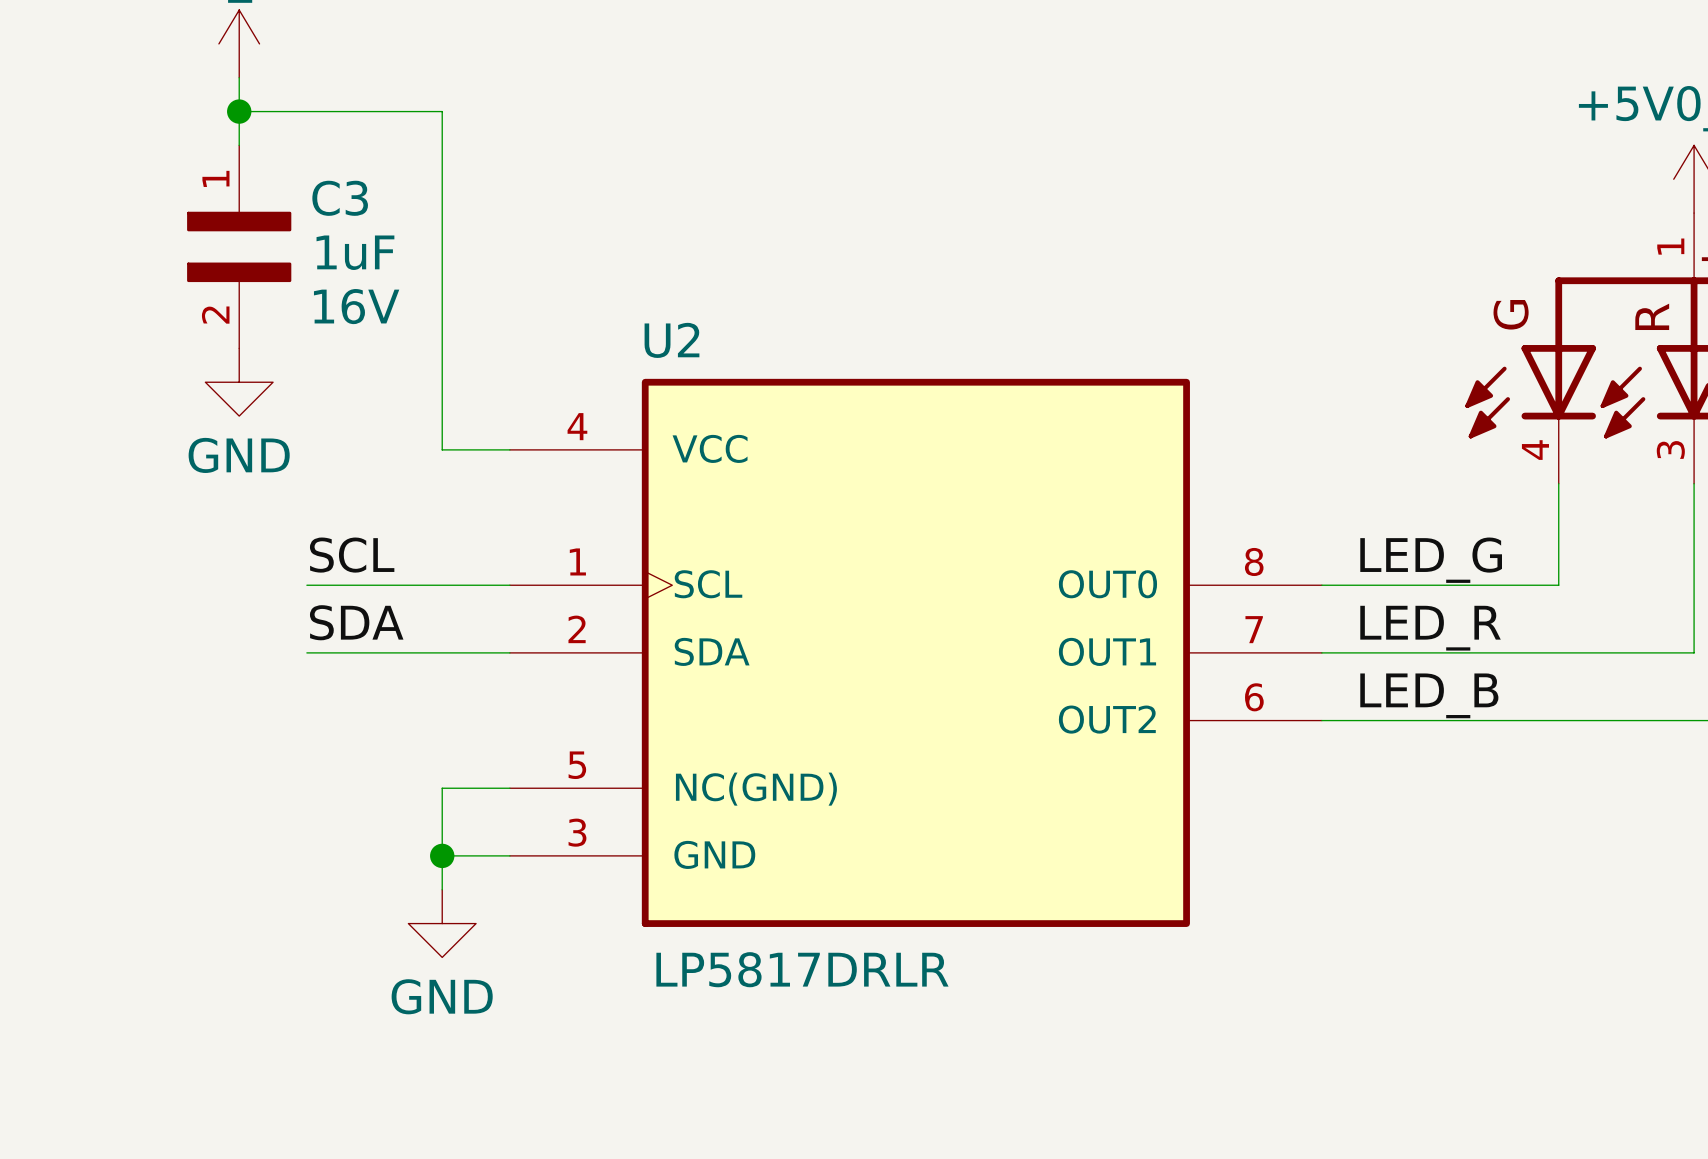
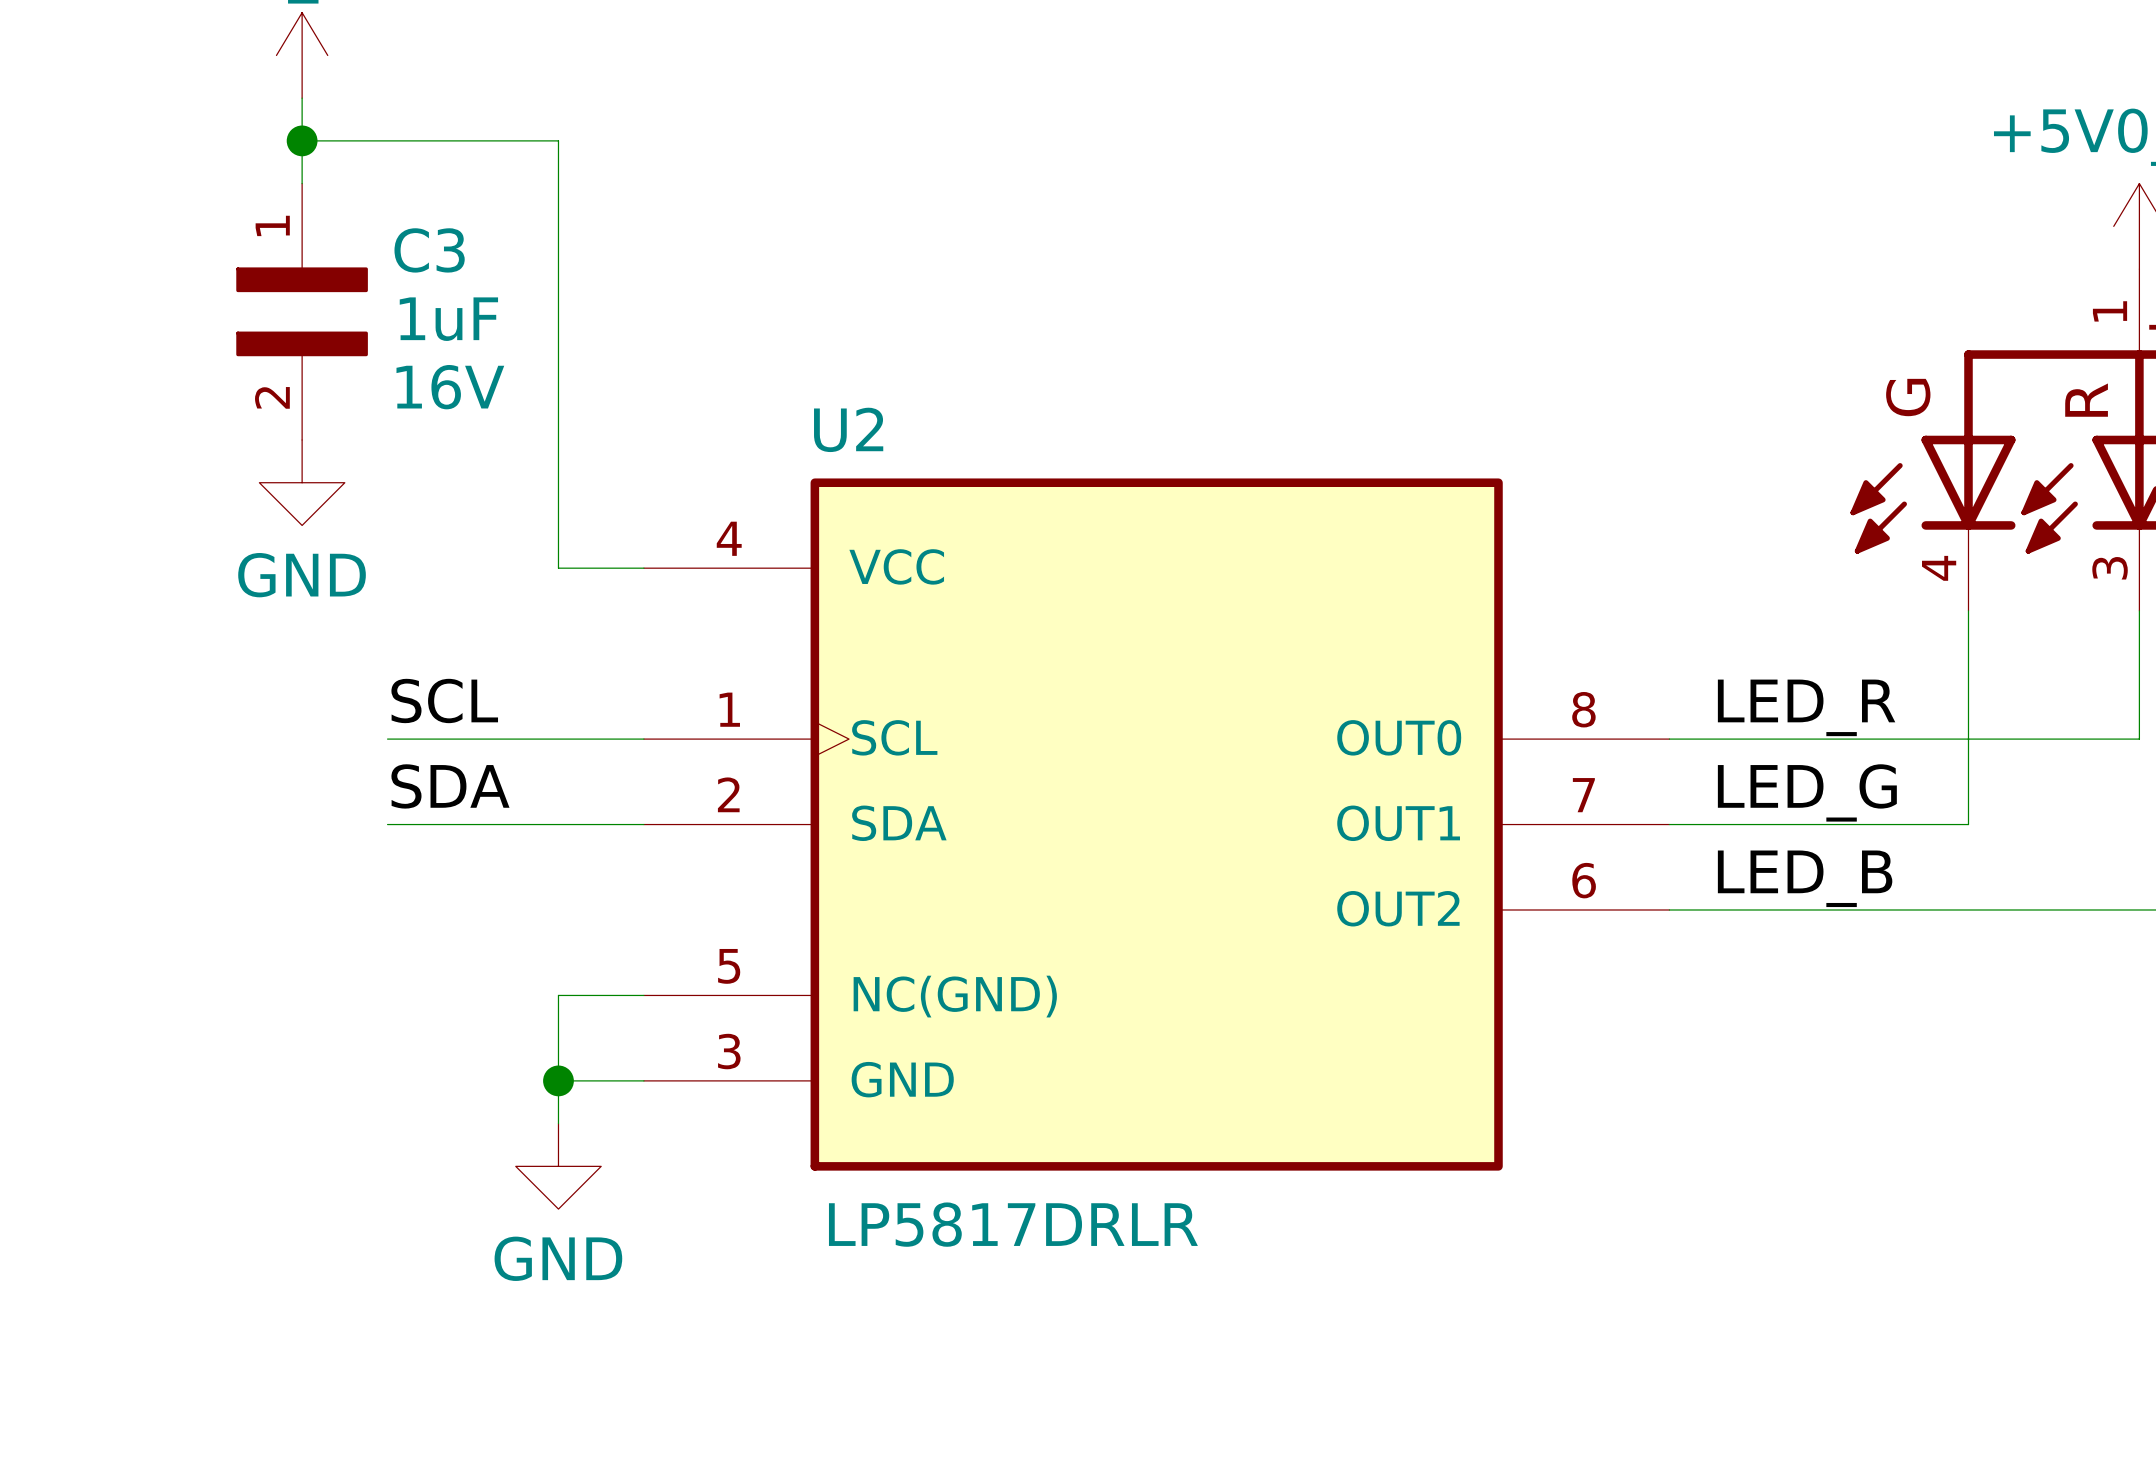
label: LED_G (1431, 560) -> LED_R (1806, 707)
wire: (1694, 585) (1694, 652) (1558, 652) -> (2139, 739) (1968, 739) (1968, 824)
label: LED_R (1430, 628) -> LED_G (1807, 792)

